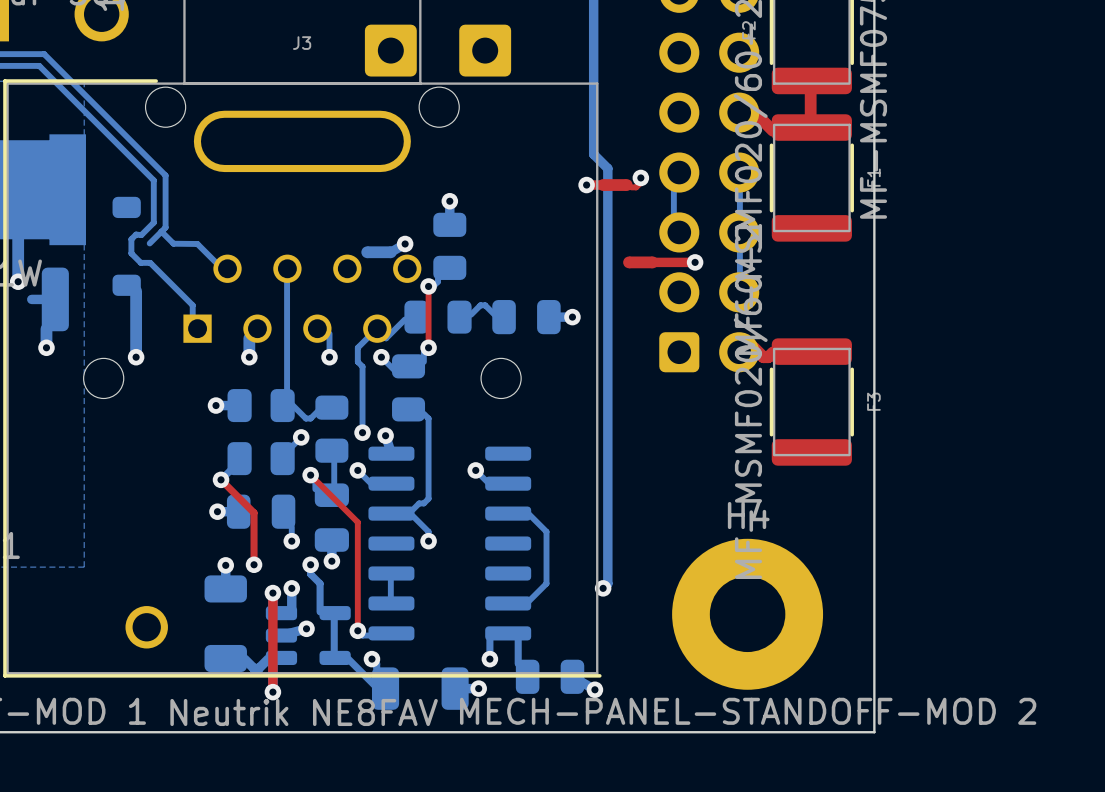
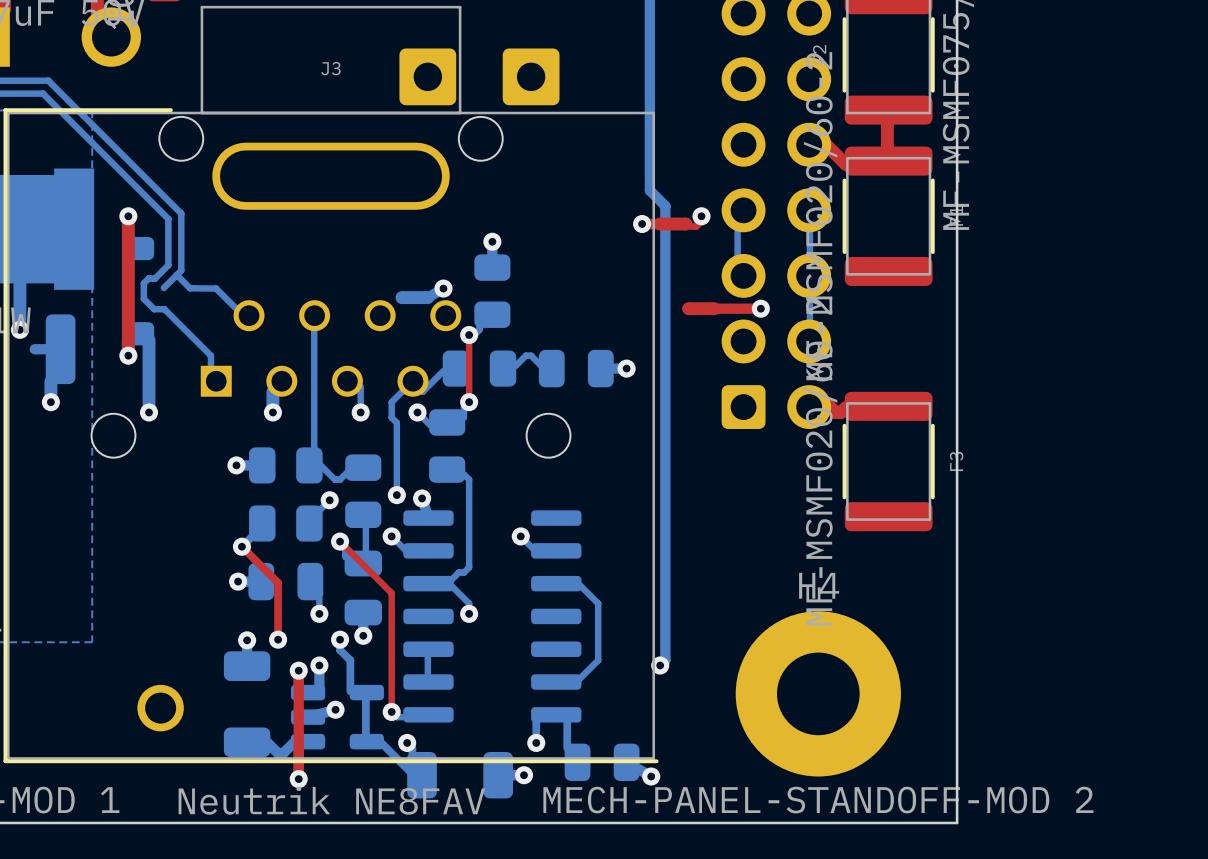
top track: none -> (128, 216) (128, 355)
via: none -> (128, 216)
via: none -> (128, 355)

